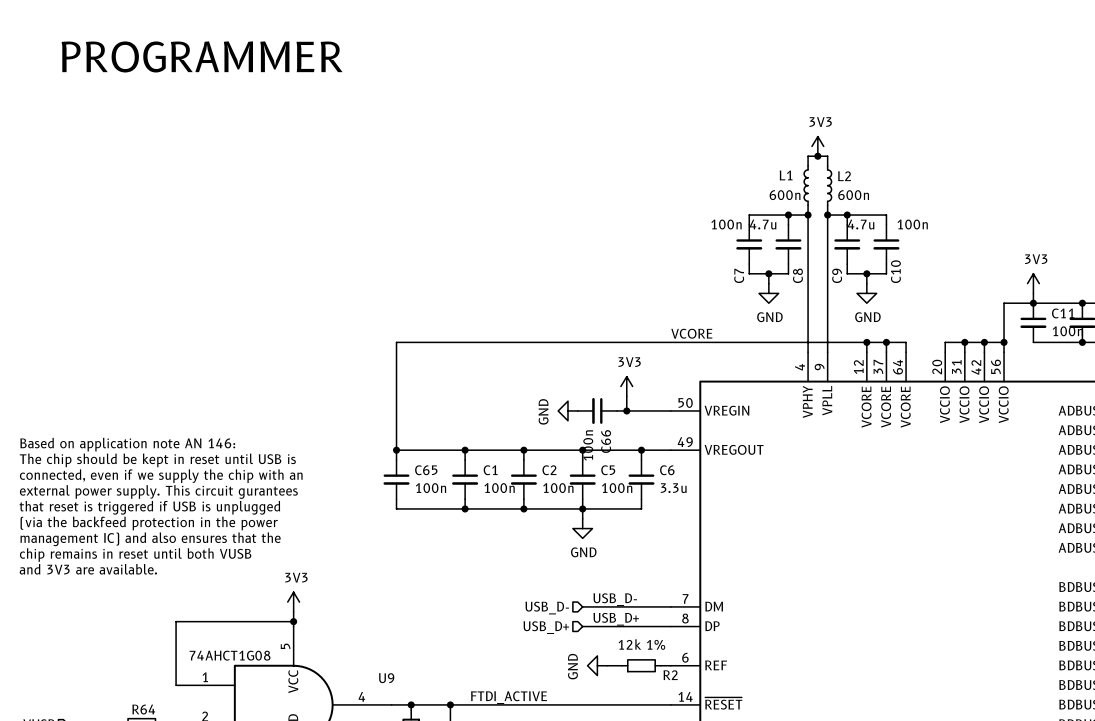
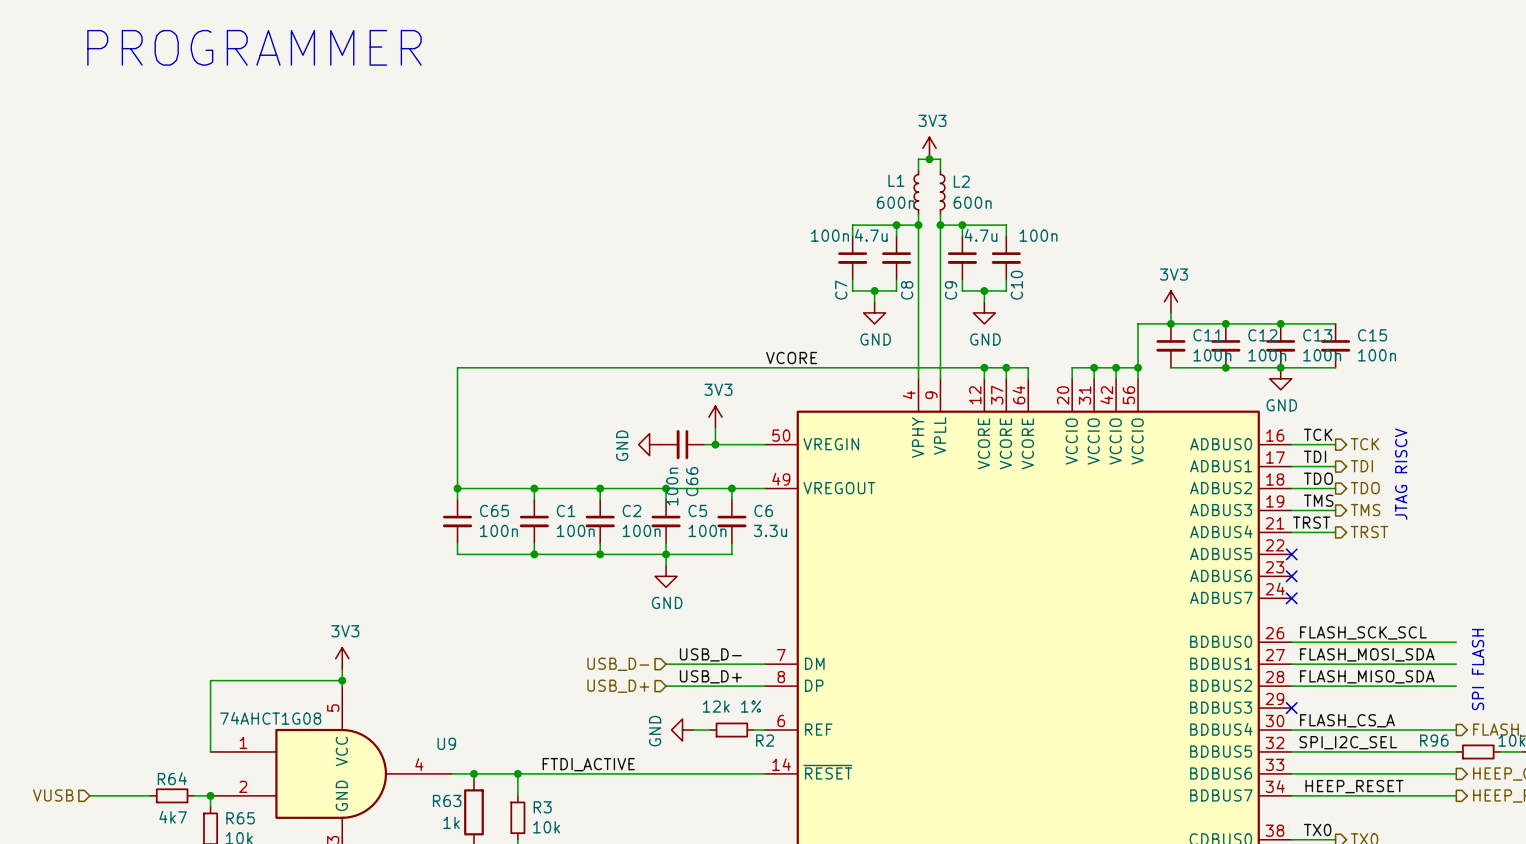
text: Based on application note AN 146: (127, 444) -> none
text: The chip should be kept in reset until USB is (157, 460) -> none
text: connected, even if we supply the chip with an (161, 476) -> none
text: external power supply. This circuit gurantees (158, 492) -> none
text: that reset is triggered if USB is unplugged (149, 507) -> none
text: (via the backfeed protection in the power (149, 523) -> none
text: management IC) and also ensures that the (150, 539) -> none
text: chip remains in reset until both VUSB (135, 555) -> none
text: and 3V3 are available. (88, 569) -> none

